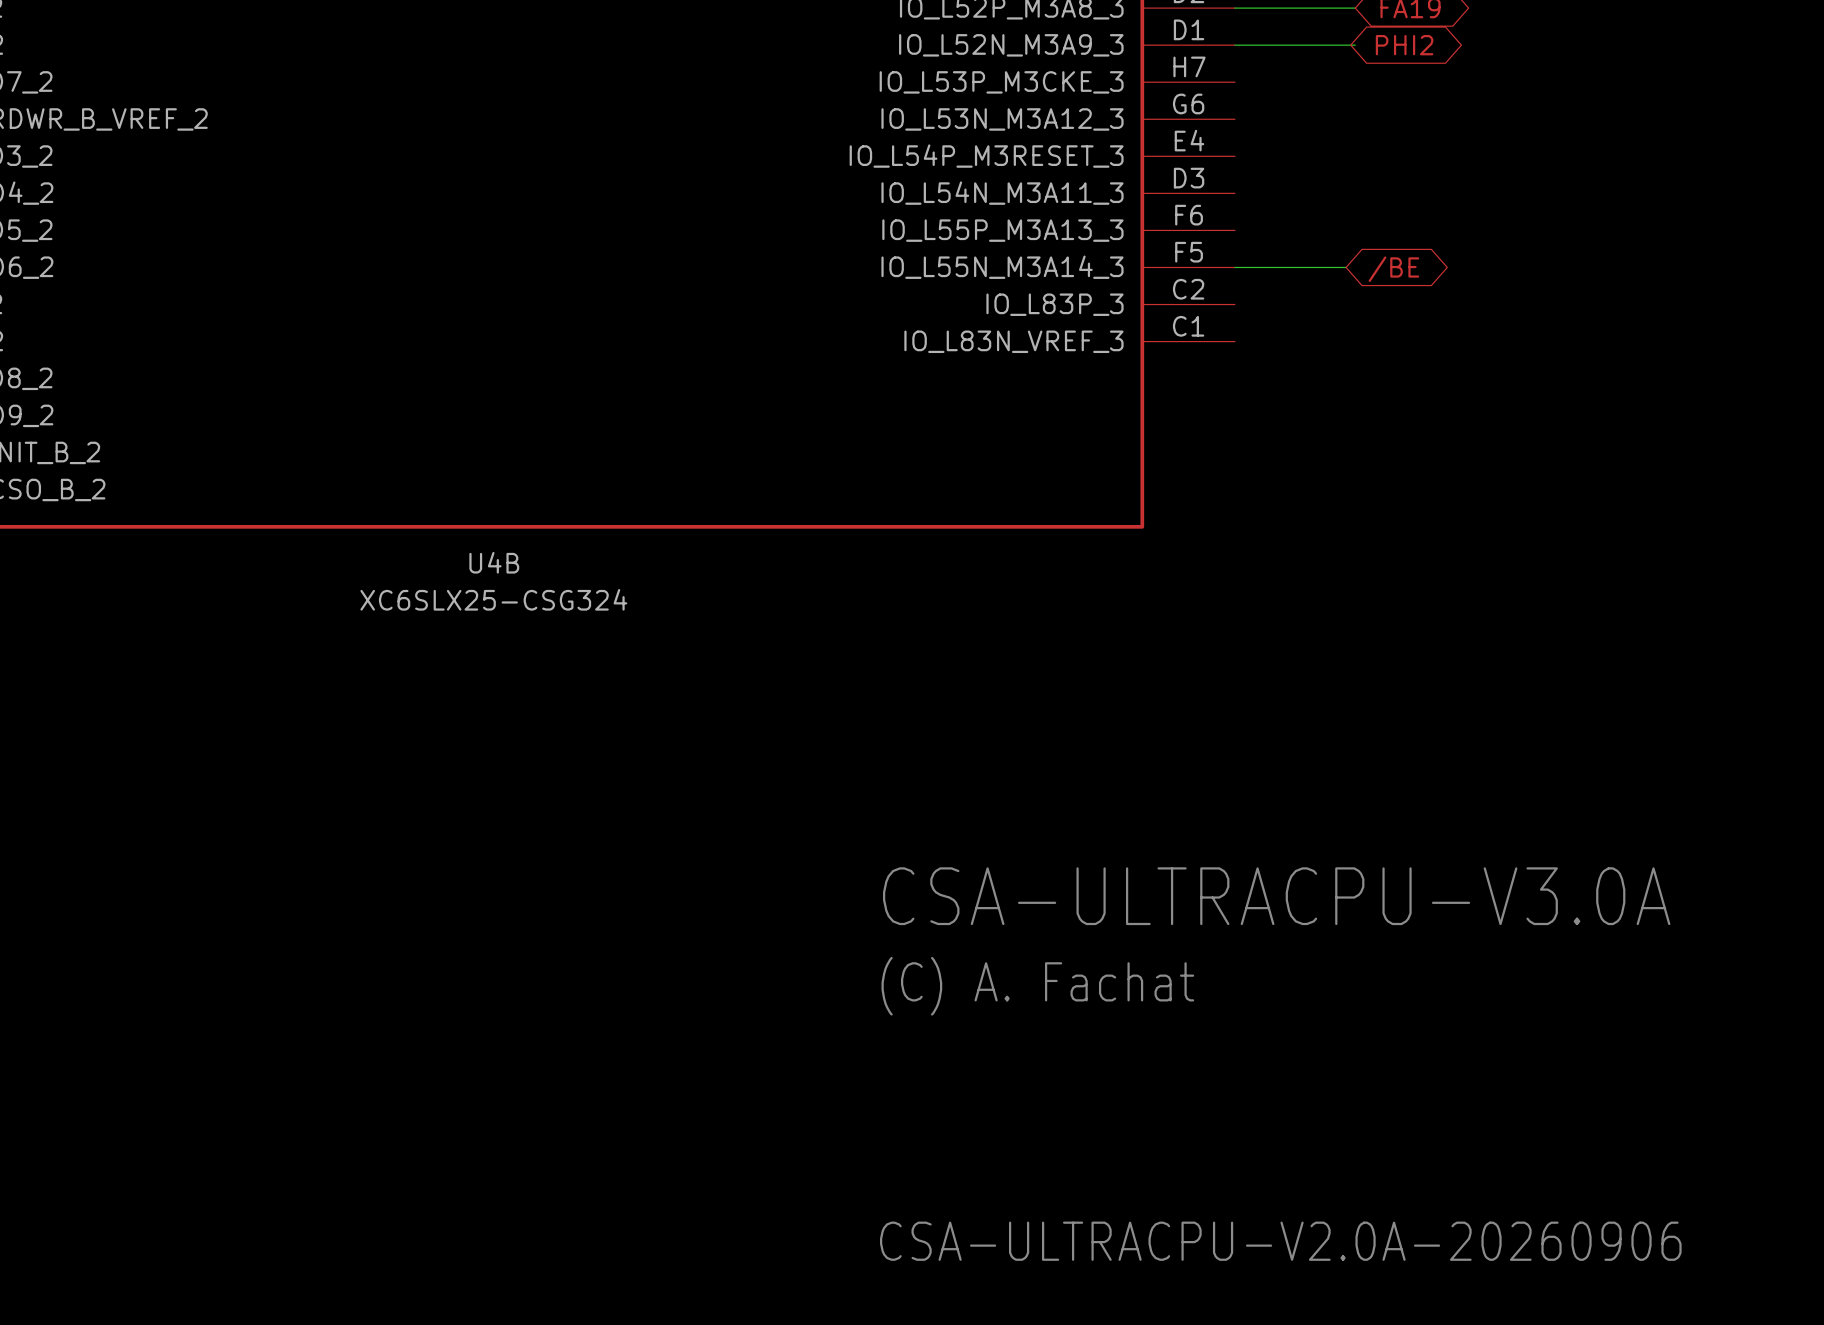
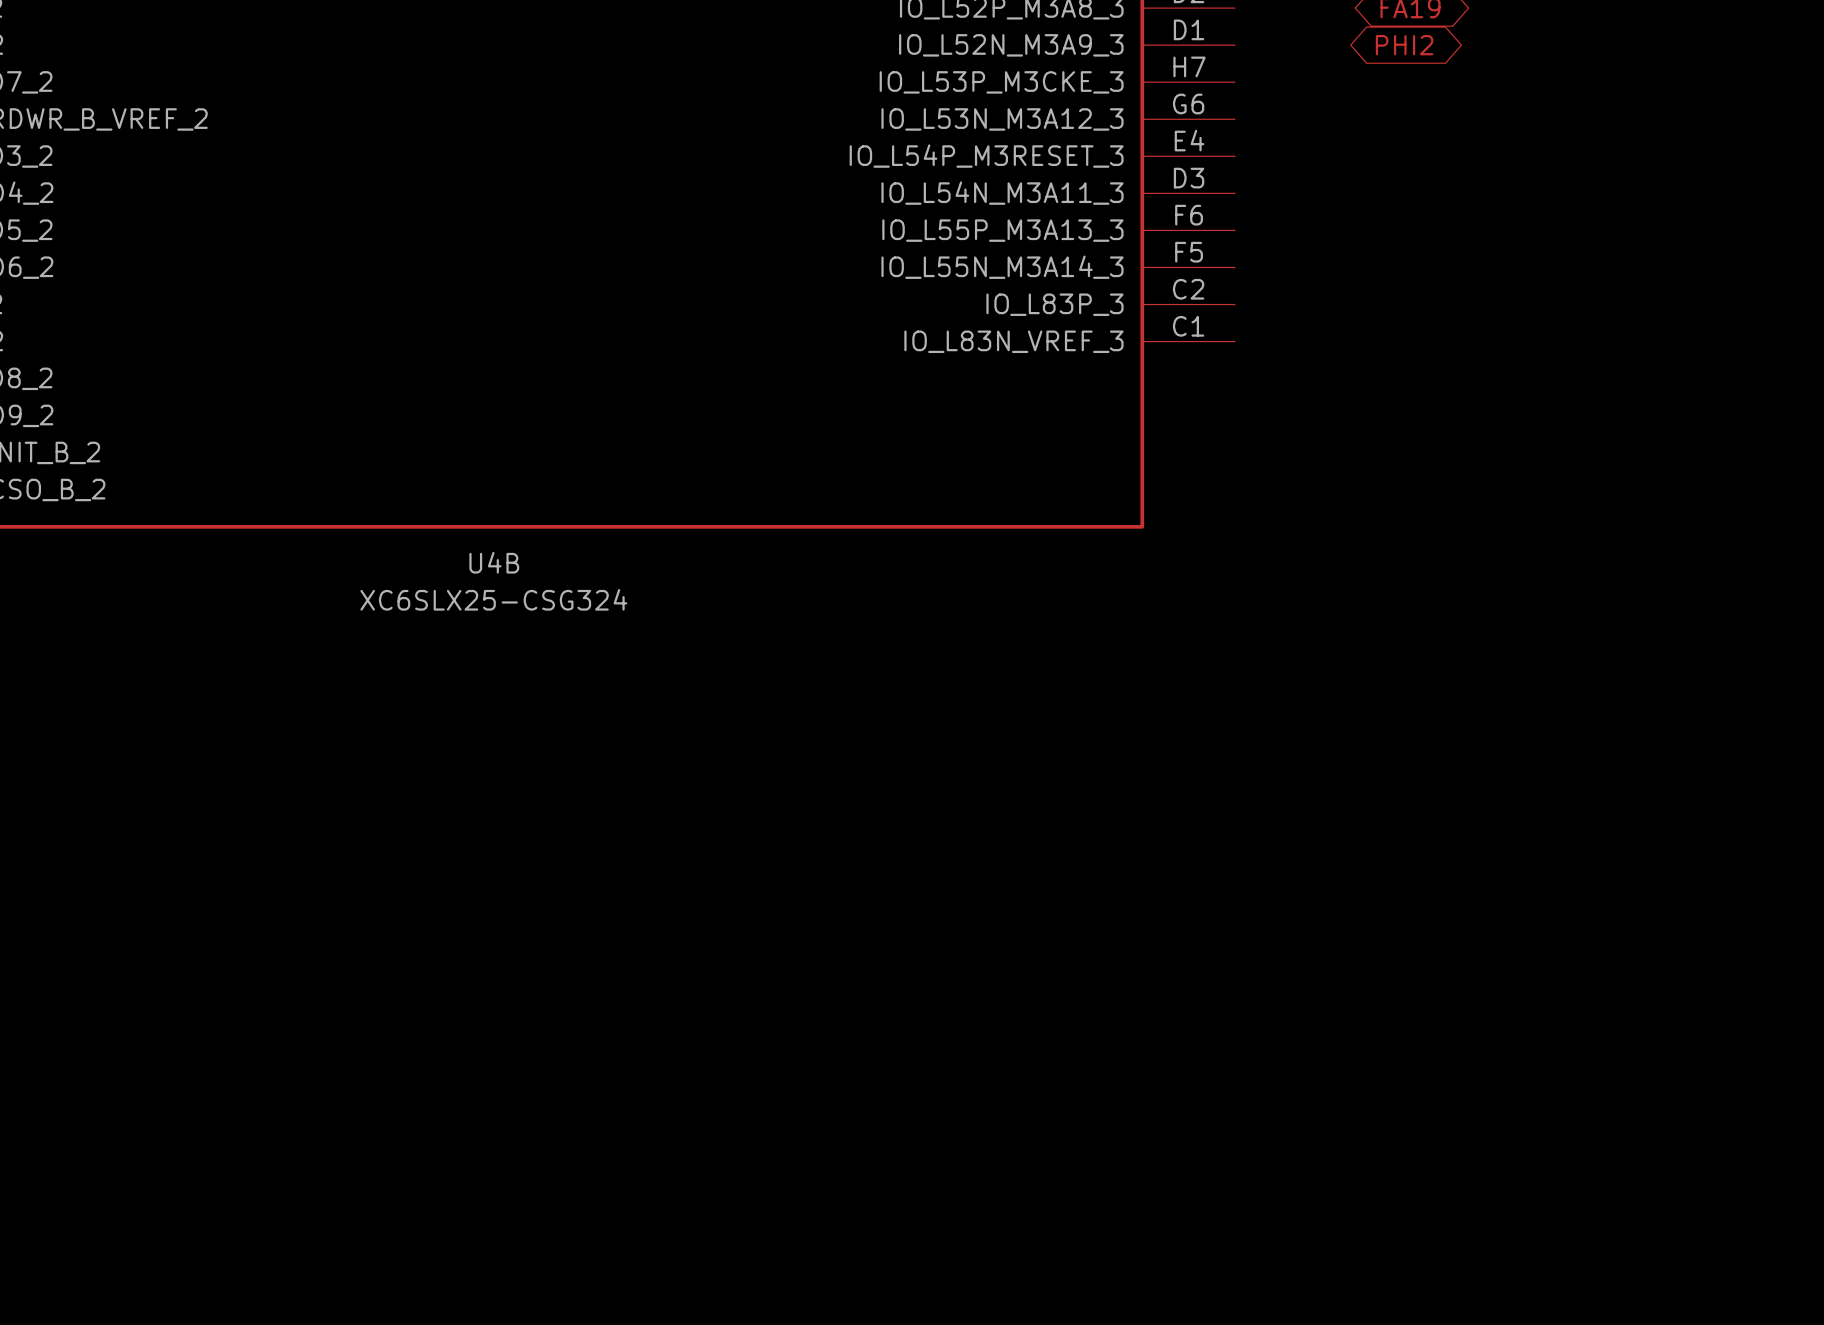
wire: (1234, 8) (1355, 8) -> none
wire: (1234, 45) (1355, 45) -> none
wire: (1234, 267) (1346, 267) -> none
global label: /BE (1393, 269) -> none
text: CSA-ULTRACPU-V3.0A (1276, 896) -> none
text: (C) A. Fachat (1037, 986) -> none
text: CSA-ULTRACPU-V2.0A-20260906 (1280, 1241) -> none

